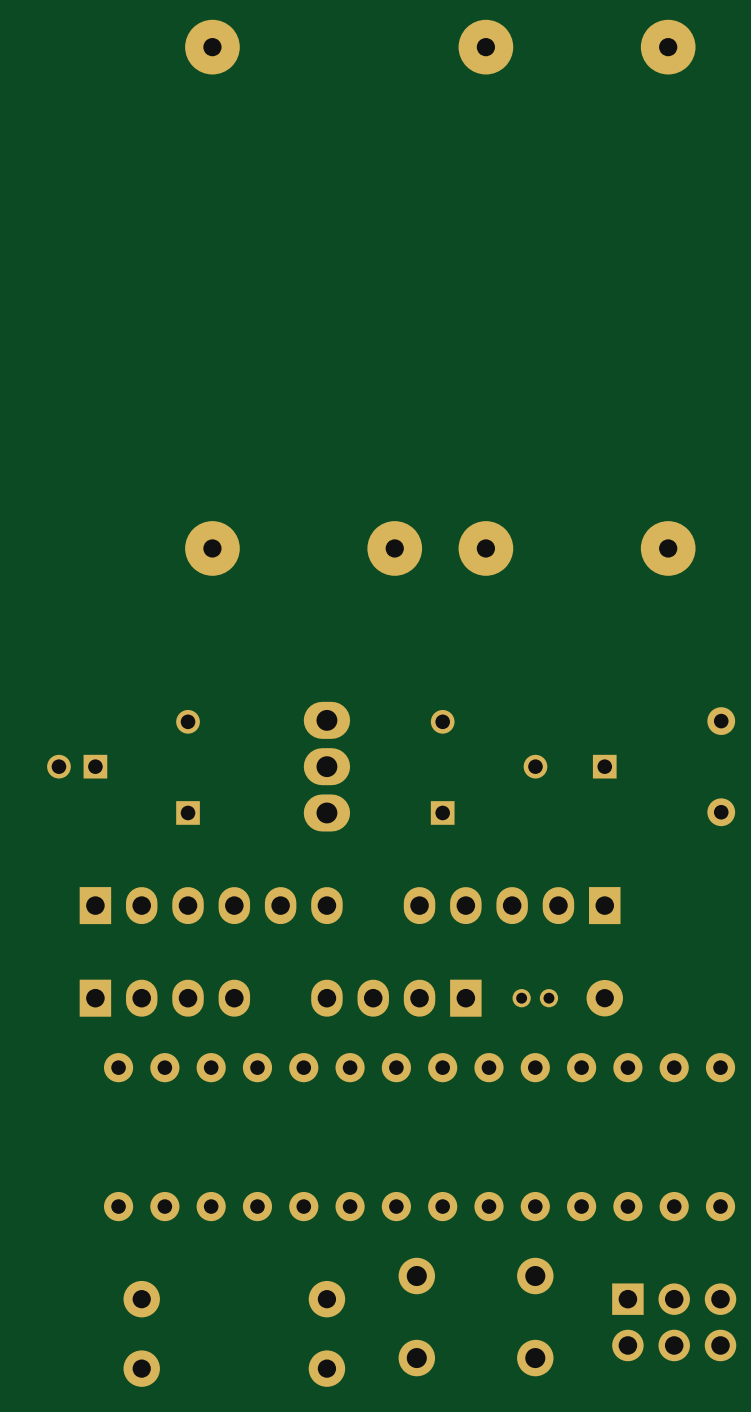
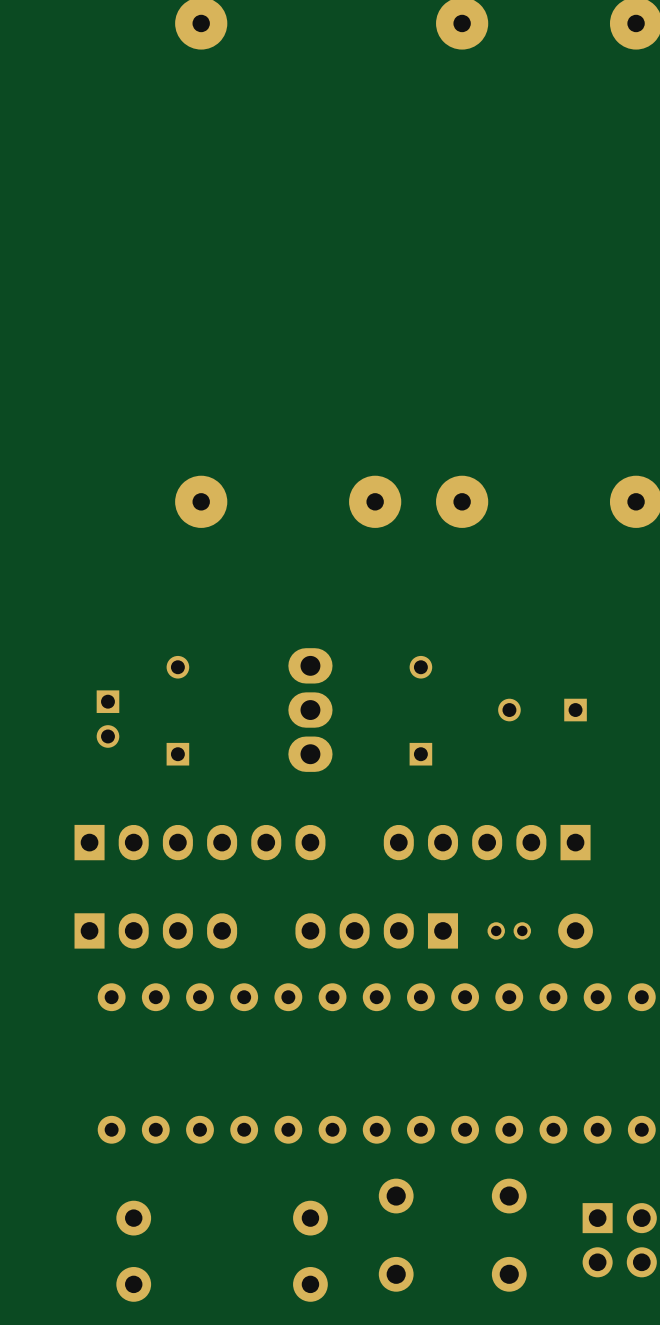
part rotation: 0° (77, 766) -> 90° counterclockwise (107, 719)
part position: (77, 766) -> (107, 719)

